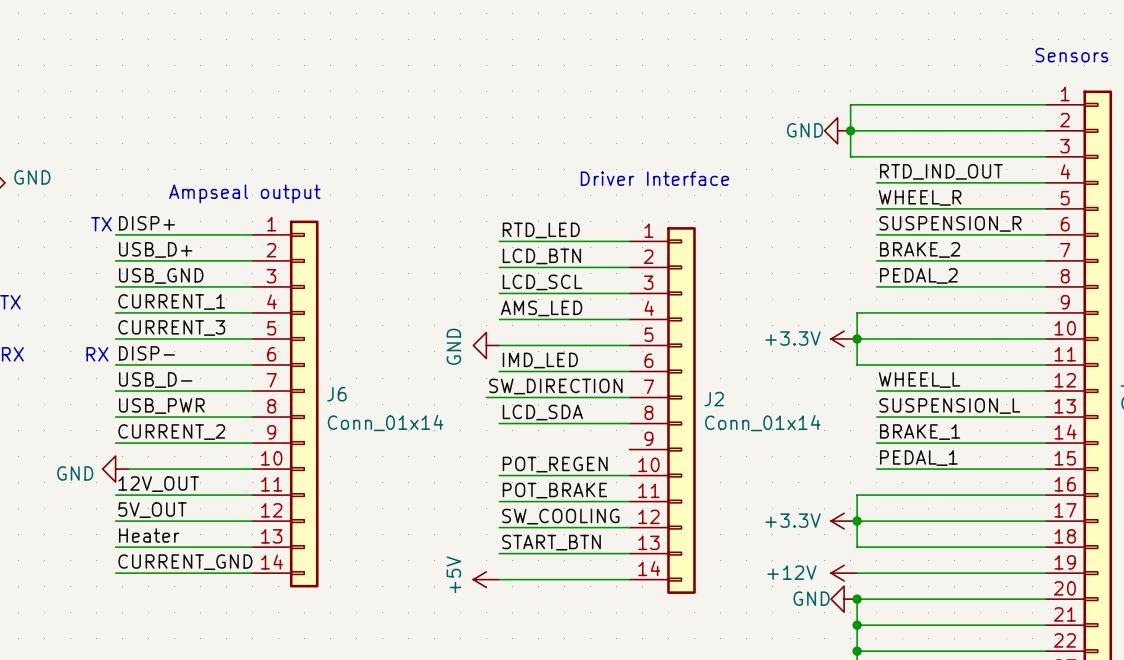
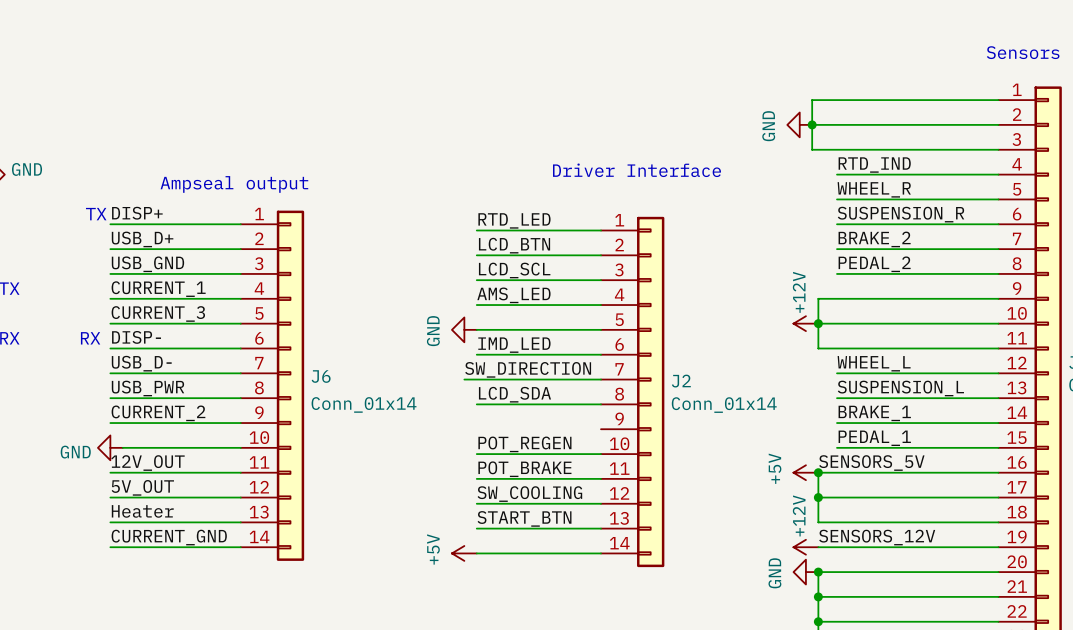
power symbol text rotation: 0° (805, 130) -> 90° counterclockwise (768, 126)
label: RTD_IND_OUT (941, 171) -> RTD_IND (874, 165)
power symbol: +3.3V (844, 338) -> +12V (805, 323)
label: none -> SENSORS_5V (871, 463)
power symbol: none -> +5V (805, 472)
junction: none -> (818, 472)
power symbol: +3.3V (844, 521) -> none
label: none -> SENSORS_12V (877, 537)
power symbol text rotation: 0° (791, 572) -> 90° counterclockwise (799, 515)
power symbol text rotation: 0° (811, 598) -> 90° counterclockwise (774, 573)

